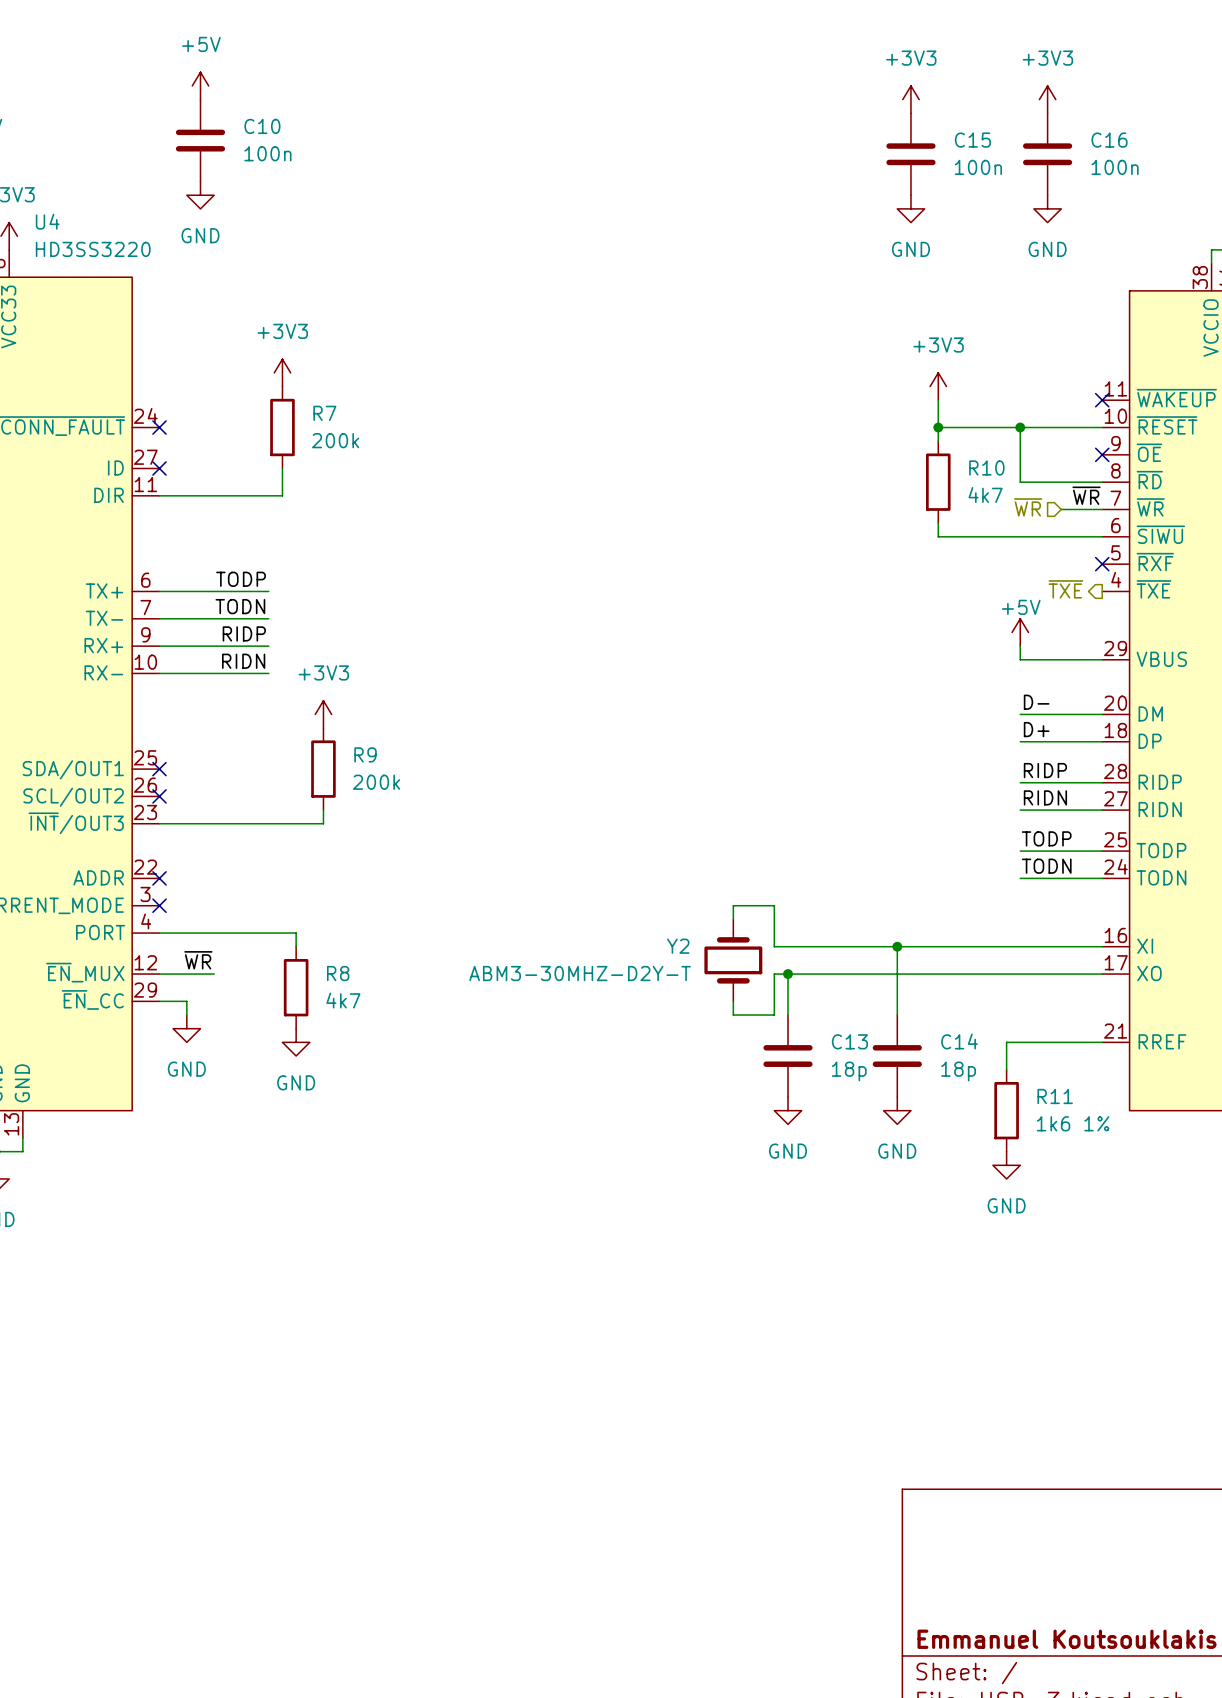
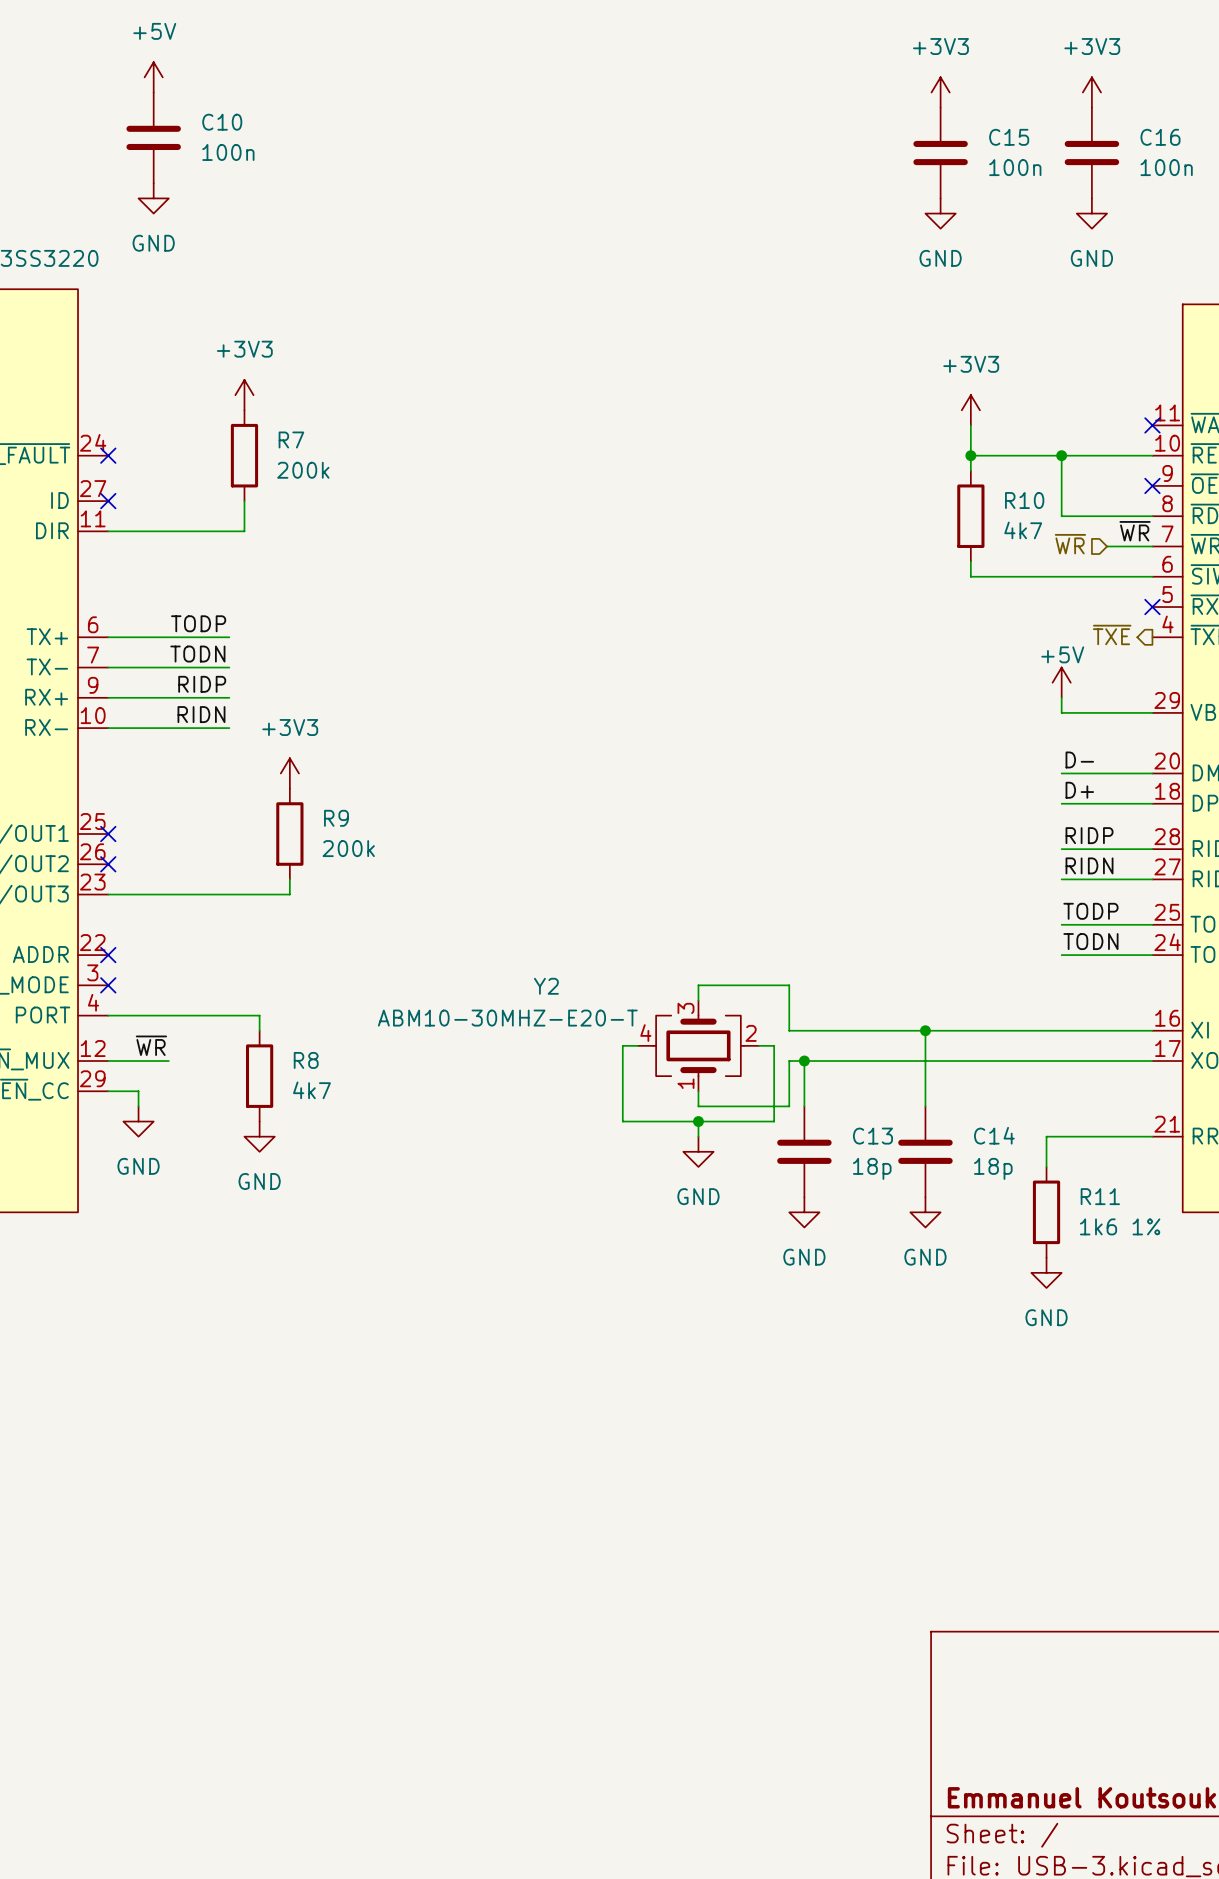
wire: (733, 905) (733, 919) -> (743, 985) (698, 985) (698, 1000)
Y2 symbol: [704, 919, 763, 1002] -> [637, 1000, 760, 1092]
Y2 name position: Y2 (678, 946) -> Y2 (546, 986)
wire: none -> (637, 1045) (622, 1045) (622, 1121) (774, 1121) (774, 1045) (759, 1045)
Y2 value: ABM3-30MHZ-D2Y-T (580, 973) -> ABM10-30MHZ-E20-T (507, 1018)
wire: (733, 1001) (733, 1015) -> (698, 1091) (698, 1106) (743, 1106)
wire: none -> (698, 1121) (698, 1136)
junction: none -> (698, 1121)
power symbol: none -> GND (698, 1151)

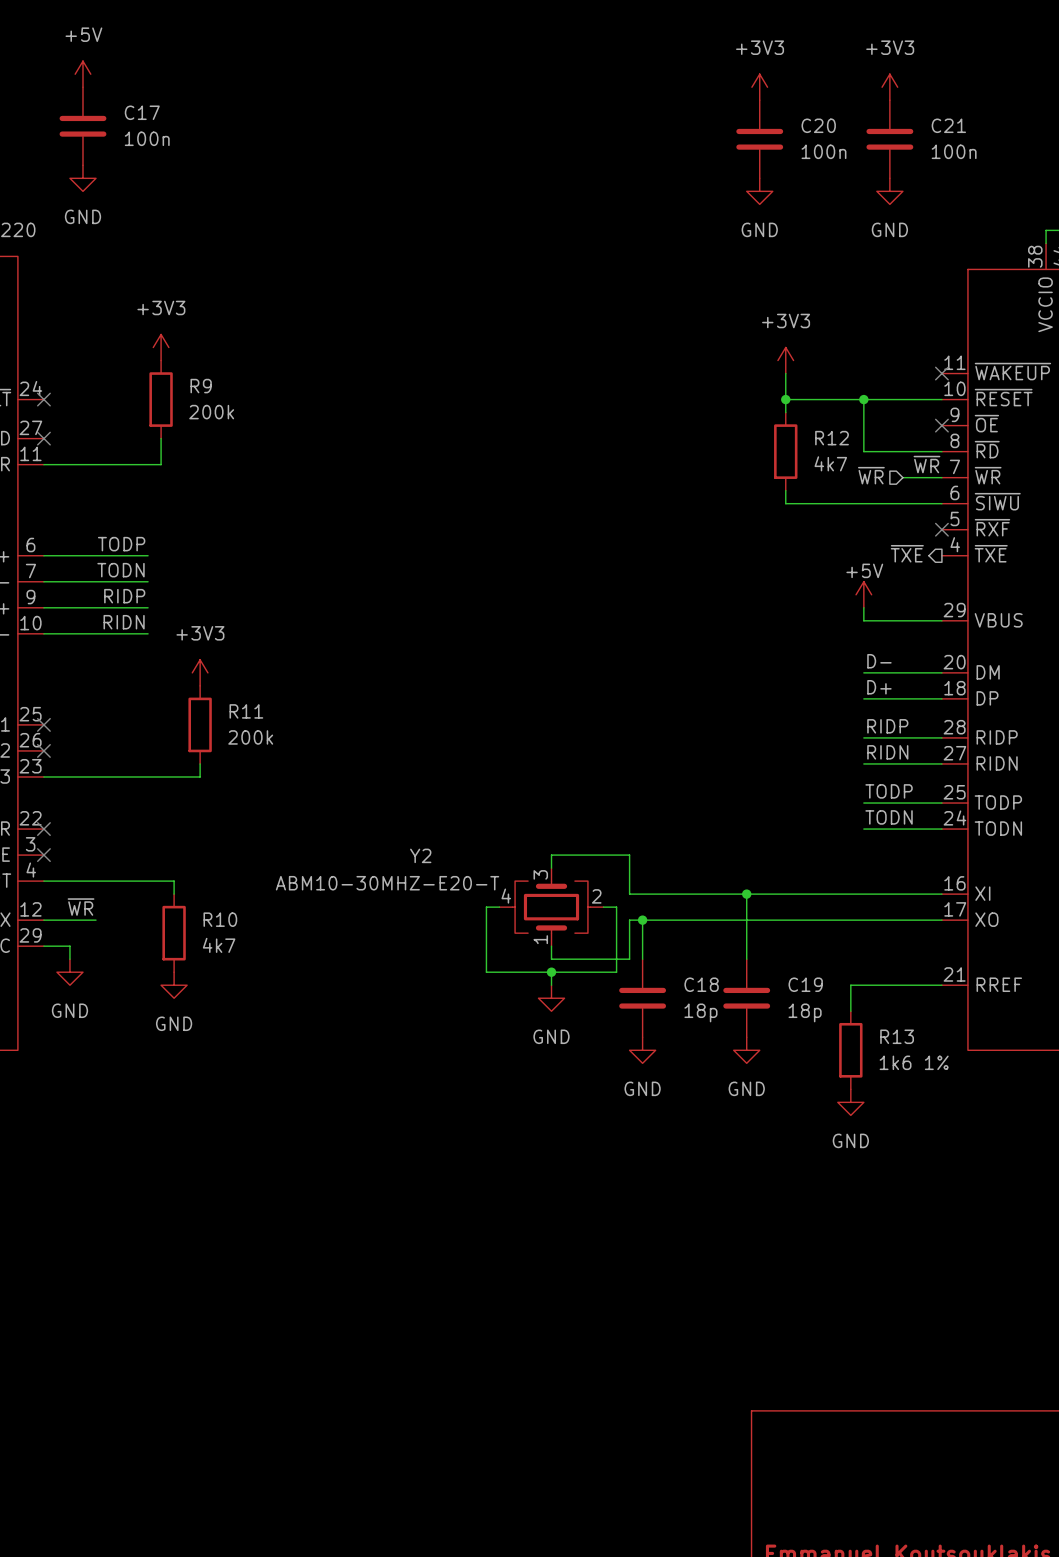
C10 name: C10 (222, 122) -> C17 (142, 112)
C15 name: C15 (1009, 137) -> C20 (818, 125)
C16 name: C16 (1160, 137) -> C21 (948, 125)
R7 name: R7 (291, 439) -> R9 (201, 386)
R10 name: R10 (1024, 500) -> R12 (832, 438)
R9 name: R9 (336, 818) -> R11 (246, 711)
R8 name: R8 (306, 1060) -> R10 (220, 919)
C14 name: C14 (994, 1135) -> C19 (805, 984)
C13 name: C13 (872, 1136) -> C18 (701, 984)
R11 name: R11 (1100, 1196) -> R13 (897, 1036)

